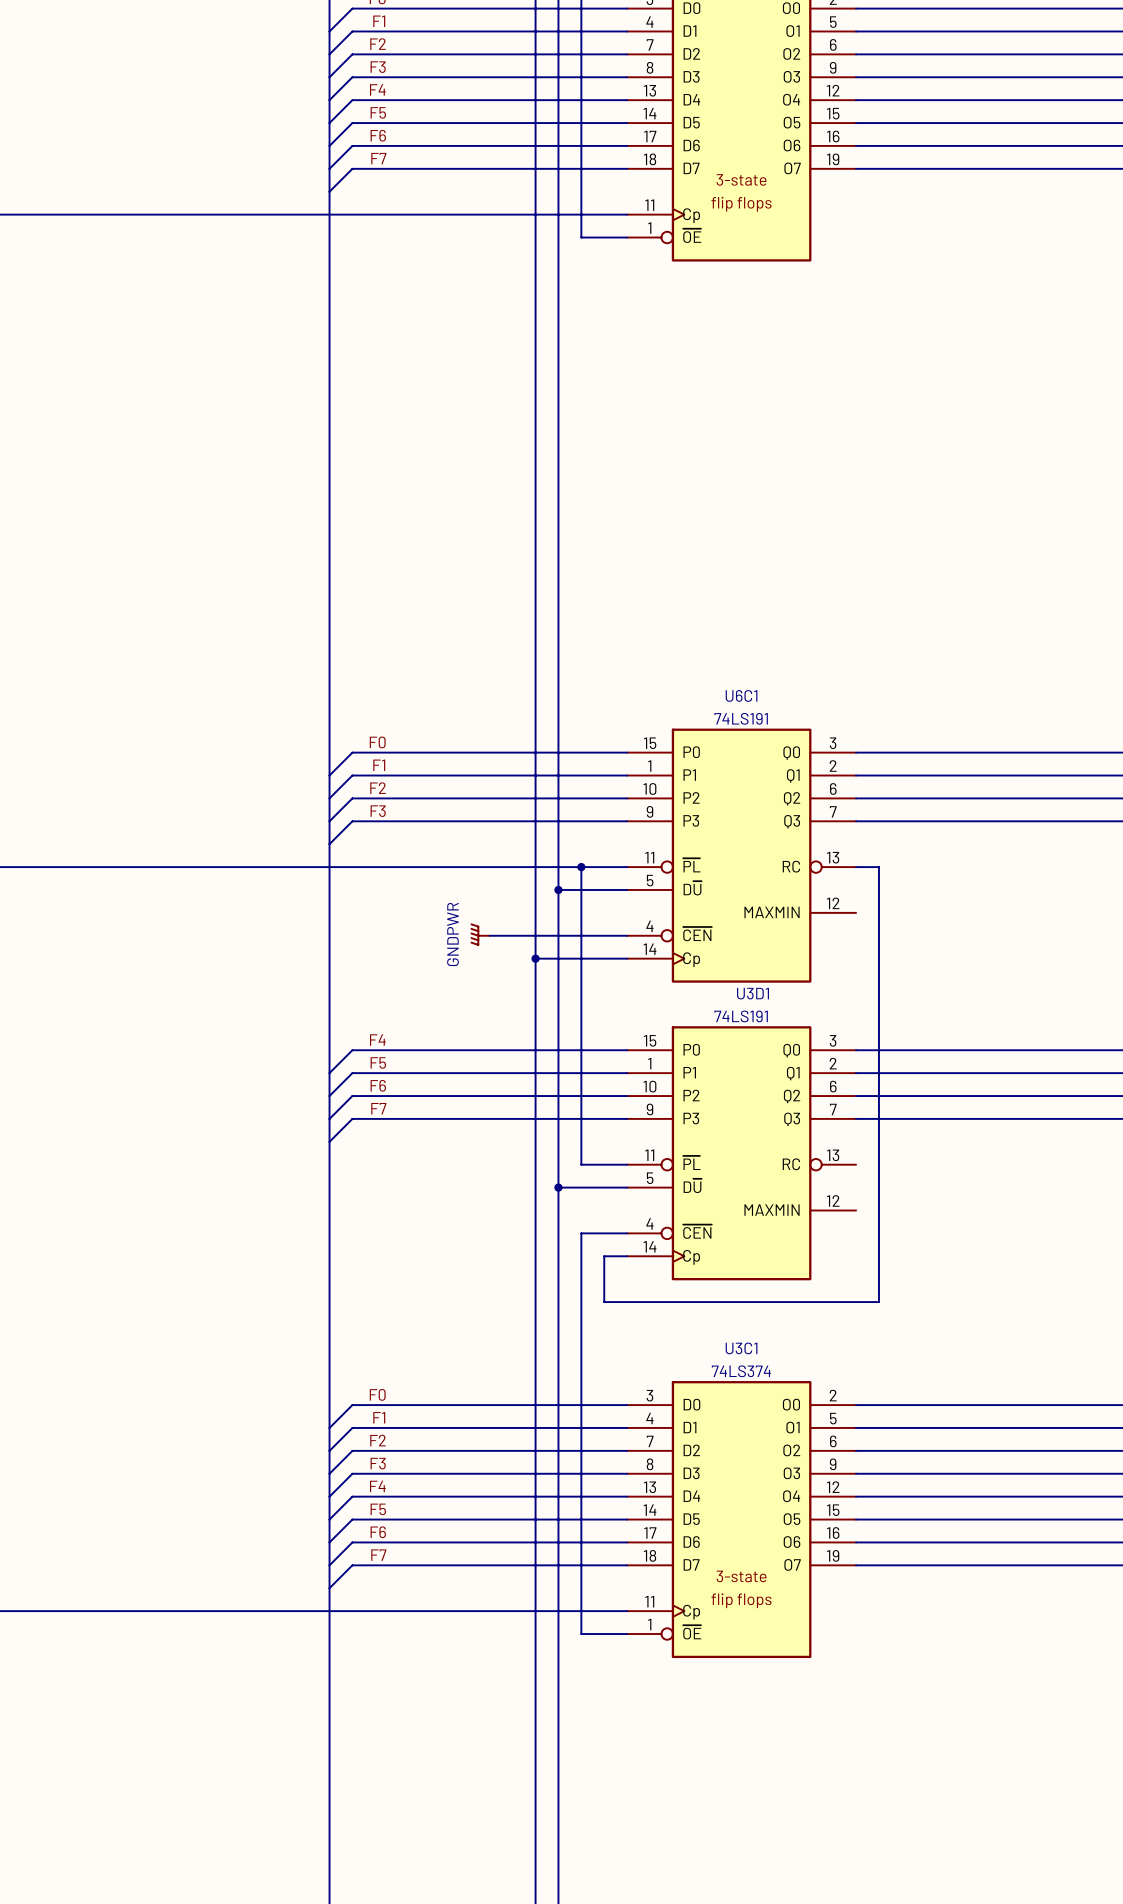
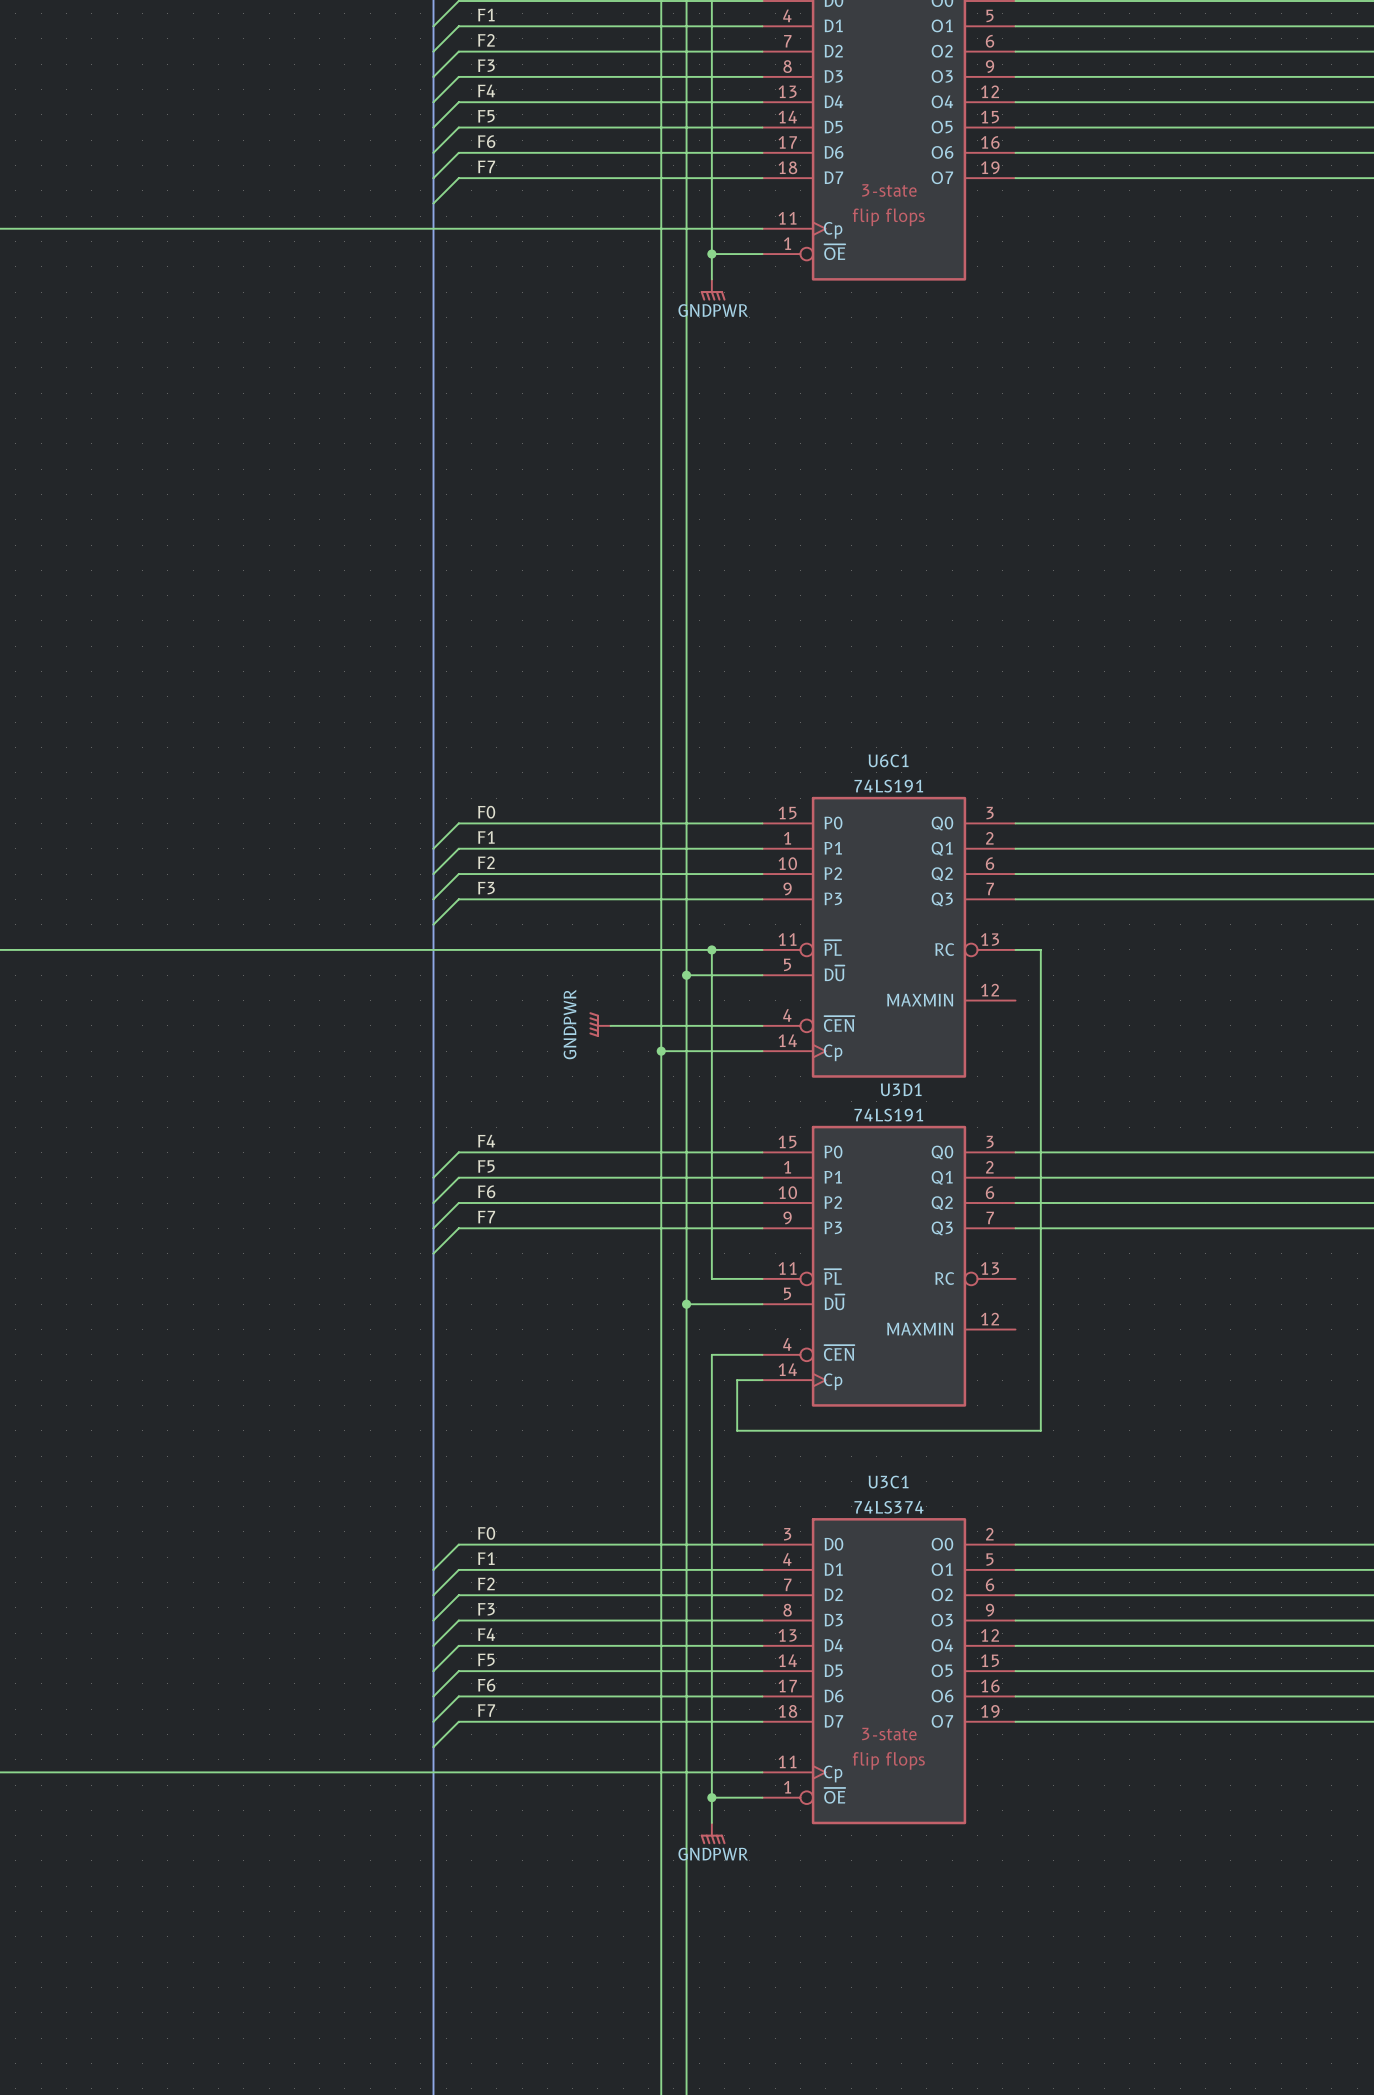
wire: none -> (711, 254) (711, 279)
junction: none -> (711, 254)
power symbol: none -> GNDPWR (713, 289)
wire: none -> (711, 1797) (711, 1822)
junction: none -> (711, 1797)
power symbol: none -> GNDPWR (713, 1833)

